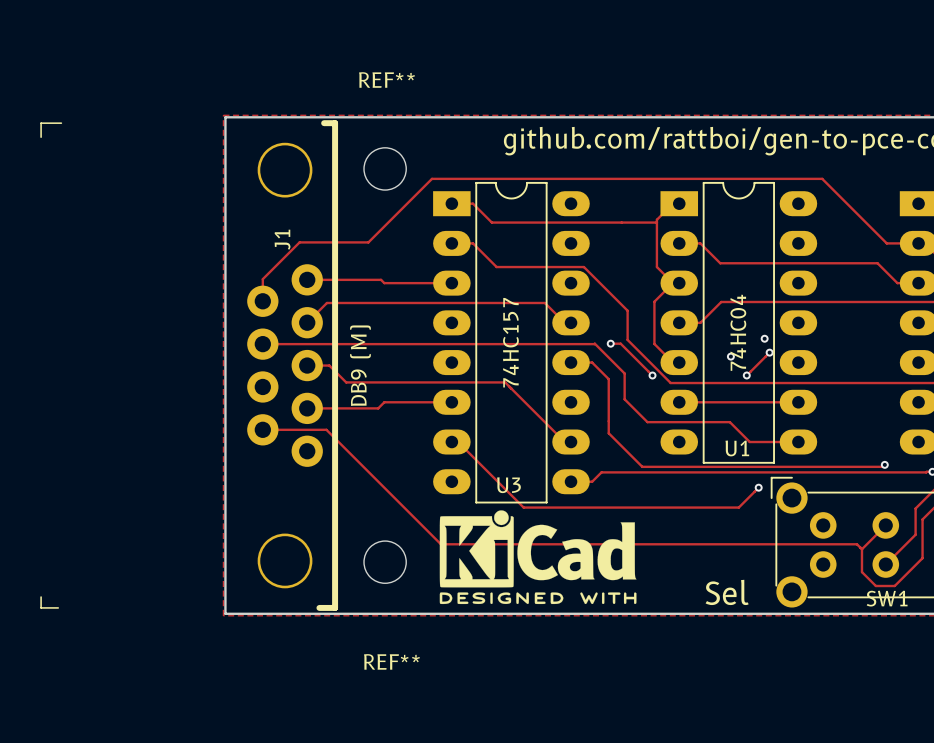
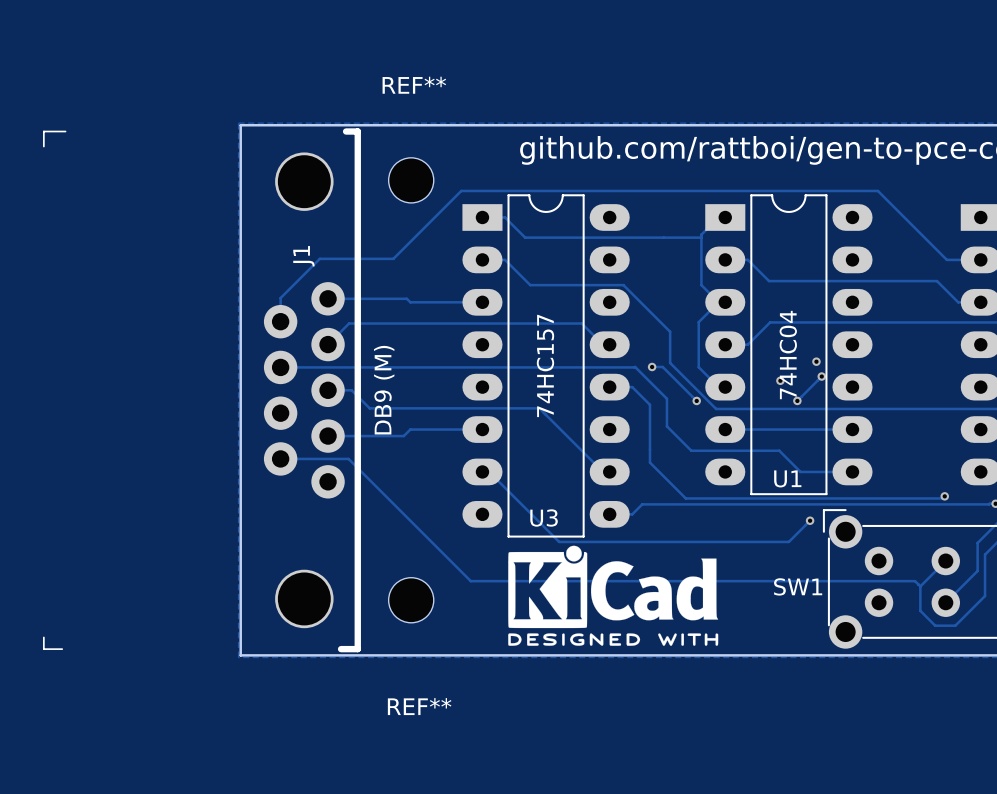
drawing position: (538, 557) -> (613, 595)
text: Sel (727, 592) -> none
SW1 name position: SW1 (887, 598) -> SW1 (798, 586)

